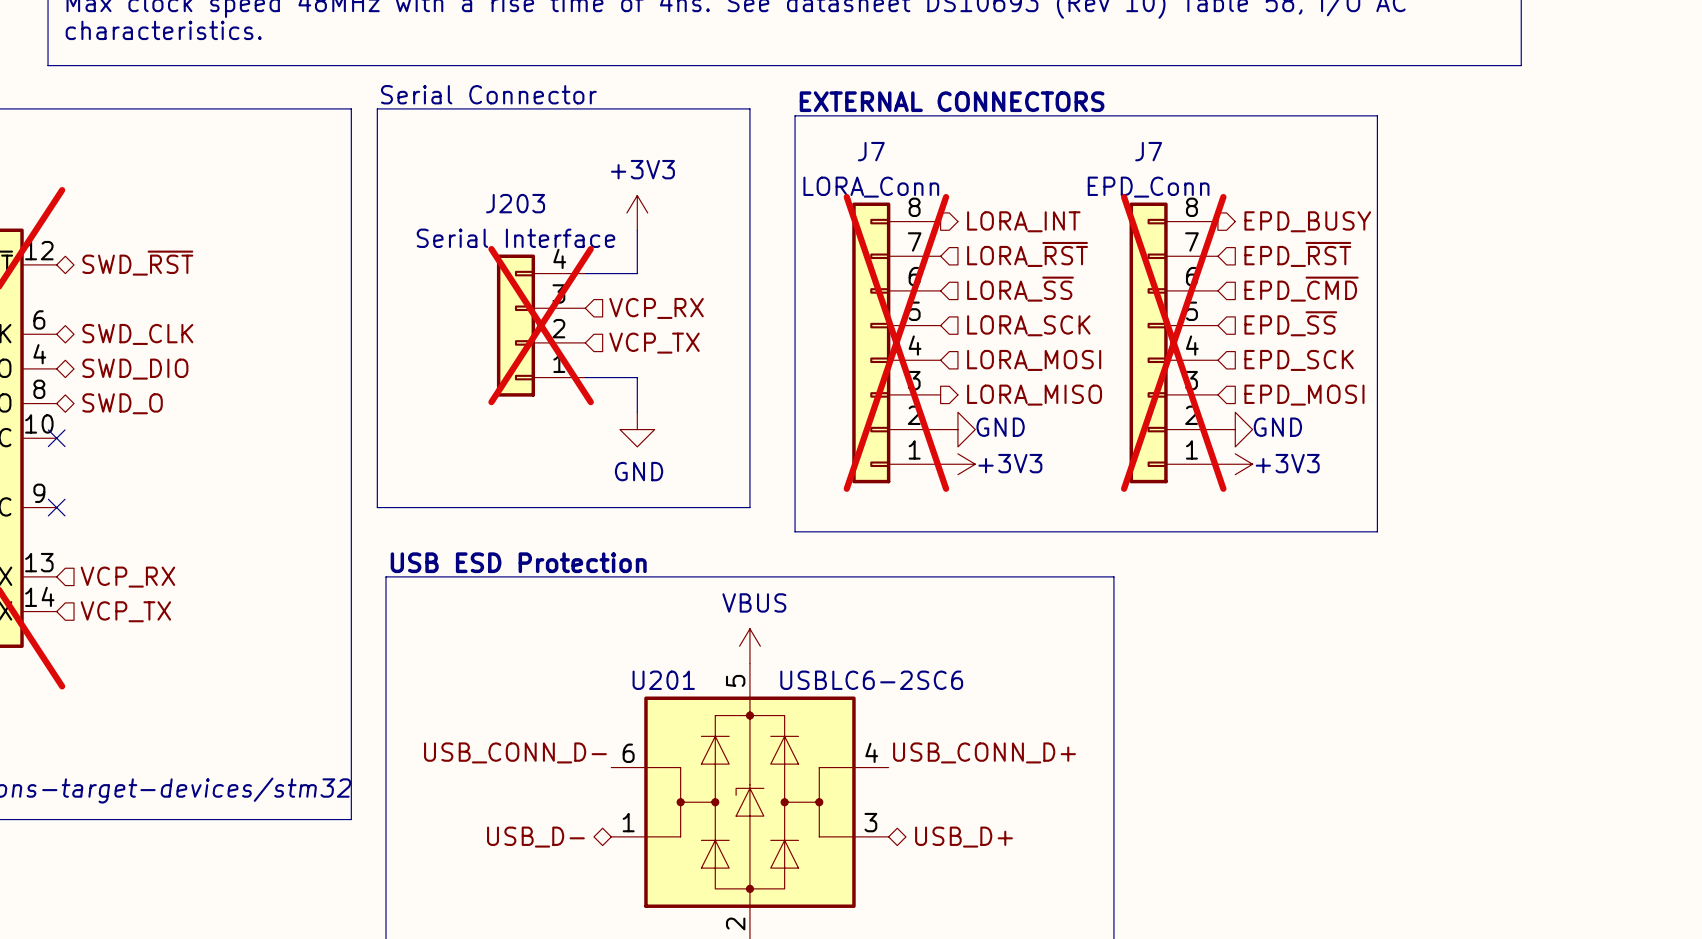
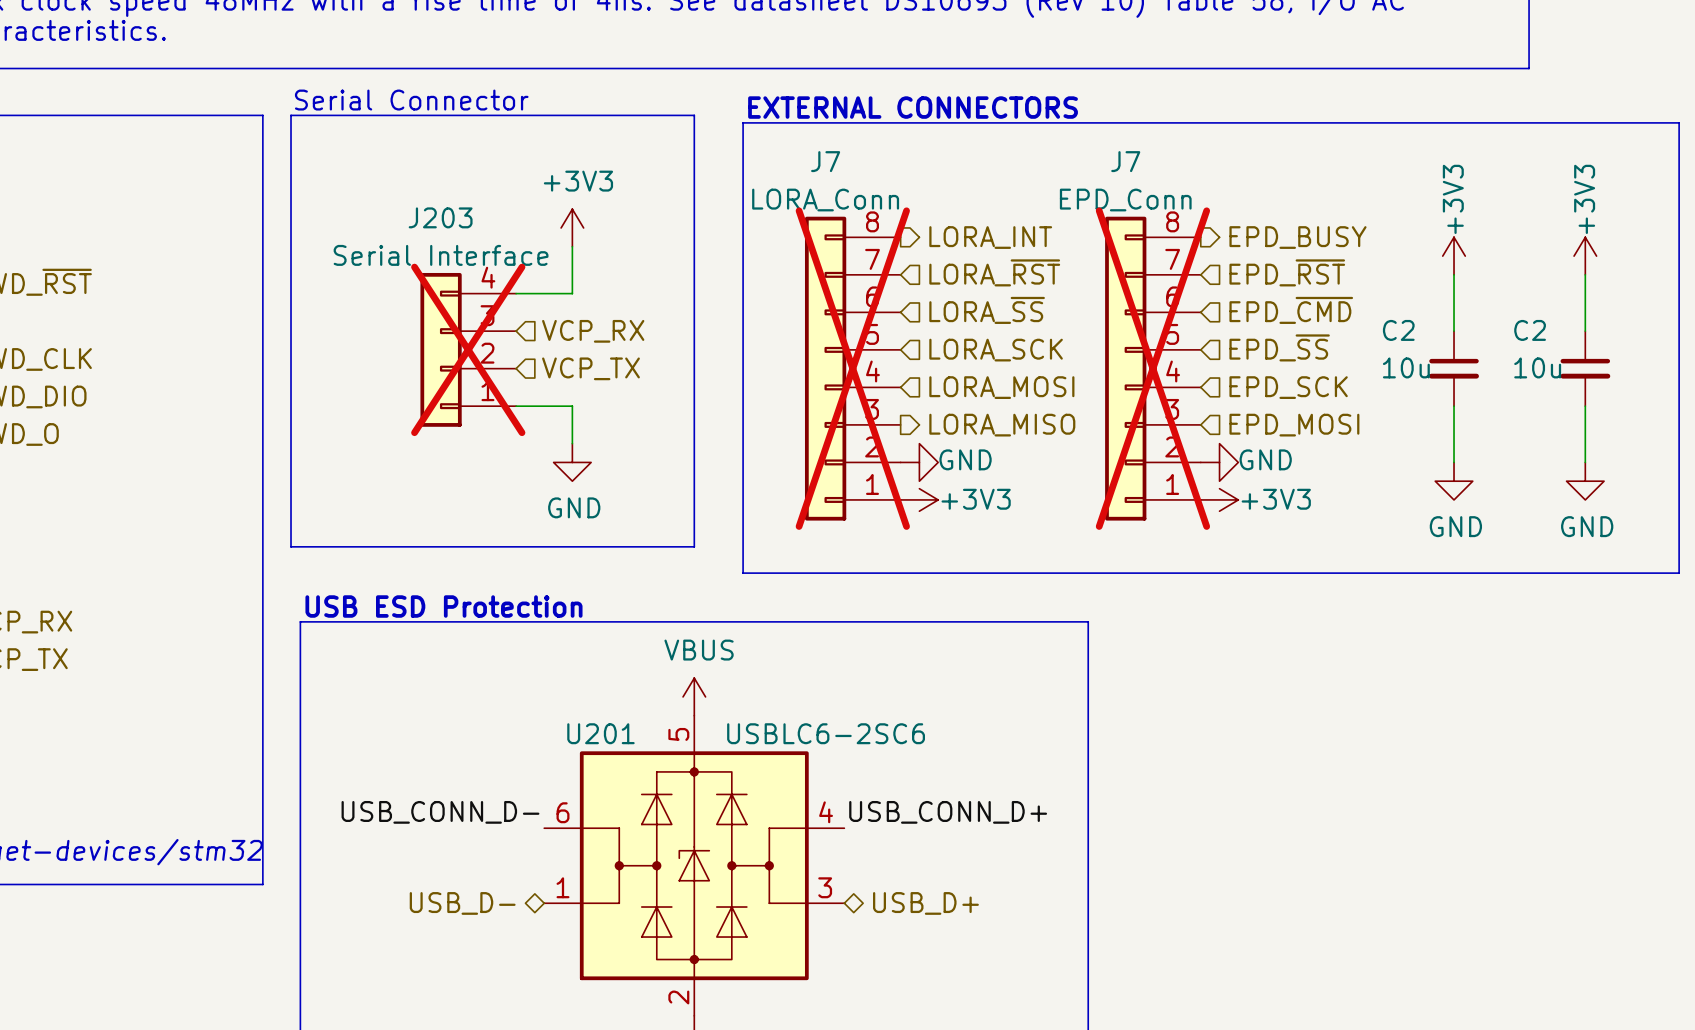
line: (1377, 115) (1377, 531) -> (1373, 122) (1679, 122) (1679, 573) (1373, 573)
power symbol: none -> +3V3 (1454, 256)
power symbol: none -> +3V3 (1585, 256)
wire: none -> (1454, 274) (1454, 331)
wire: none -> (1585, 274) (1585, 331)
C2: none -> 10u (1454, 368)
C2: none -> 10u (1585, 368)
wire: none -> (1454, 406) (1454, 462)
wire: none -> (1585, 406) (1585, 462)
power symbol: none -> GND (1454, 481)
power symbol: none -> GND (1585, 481)

